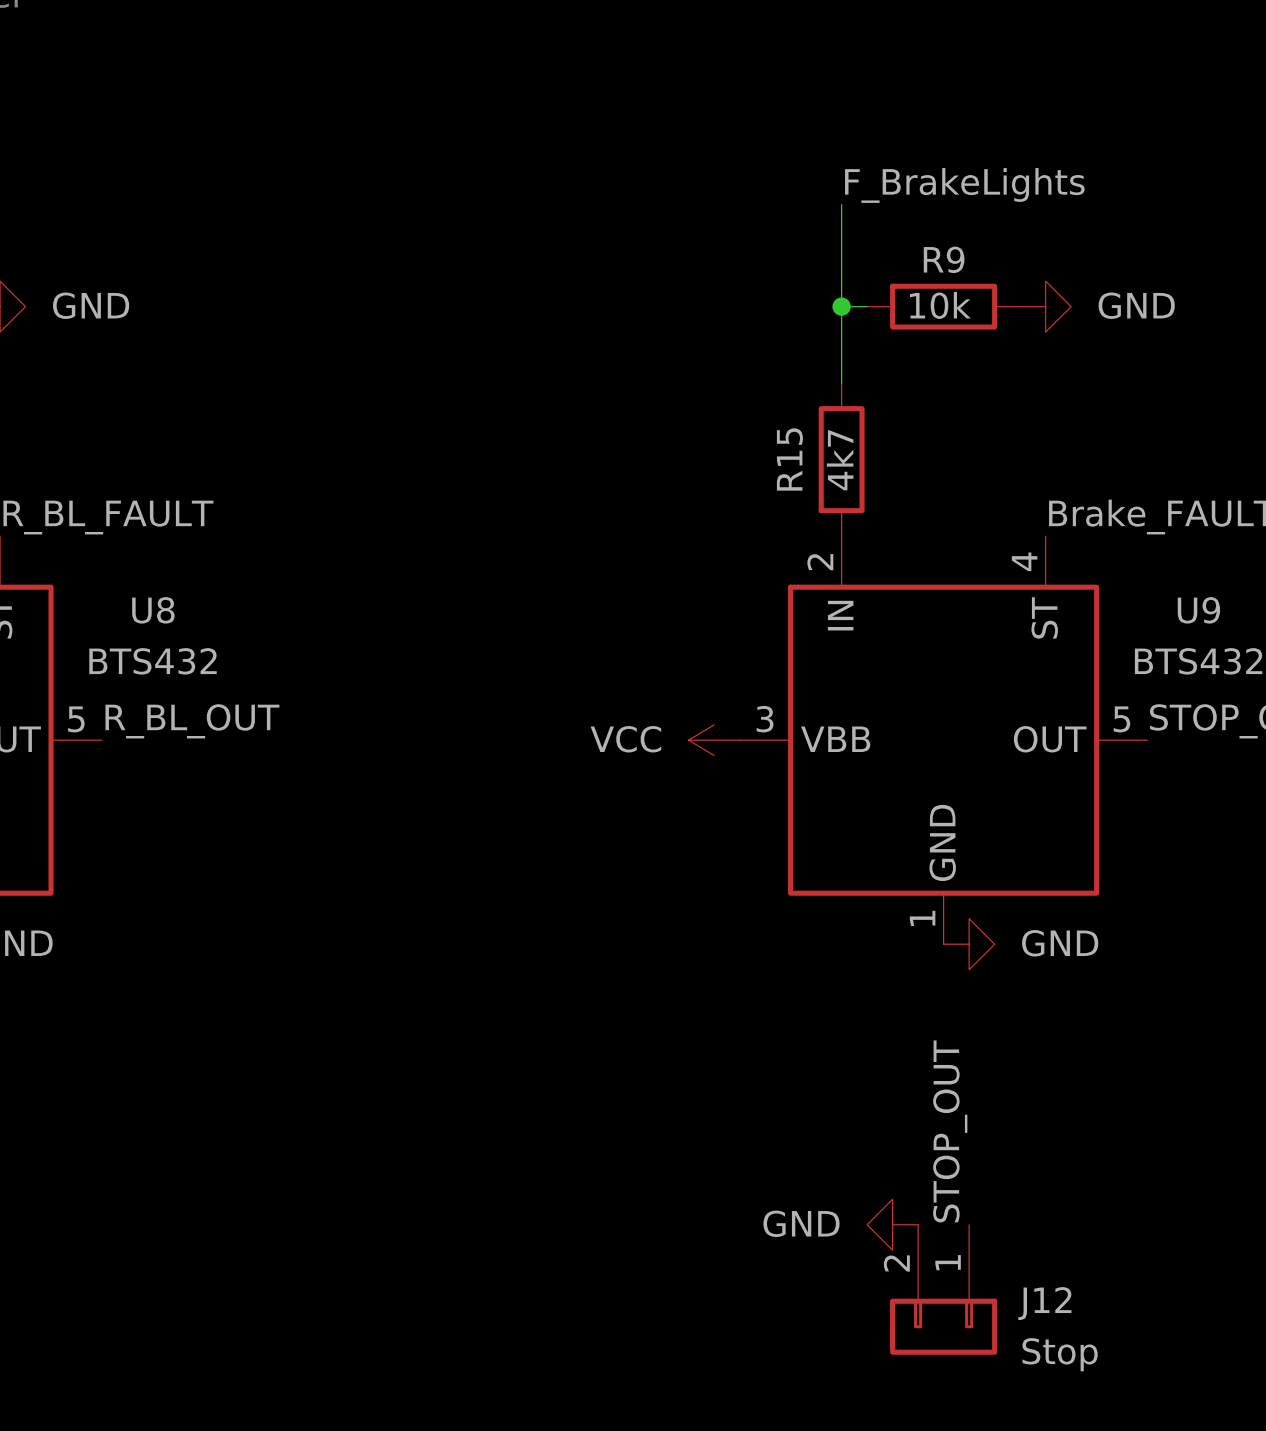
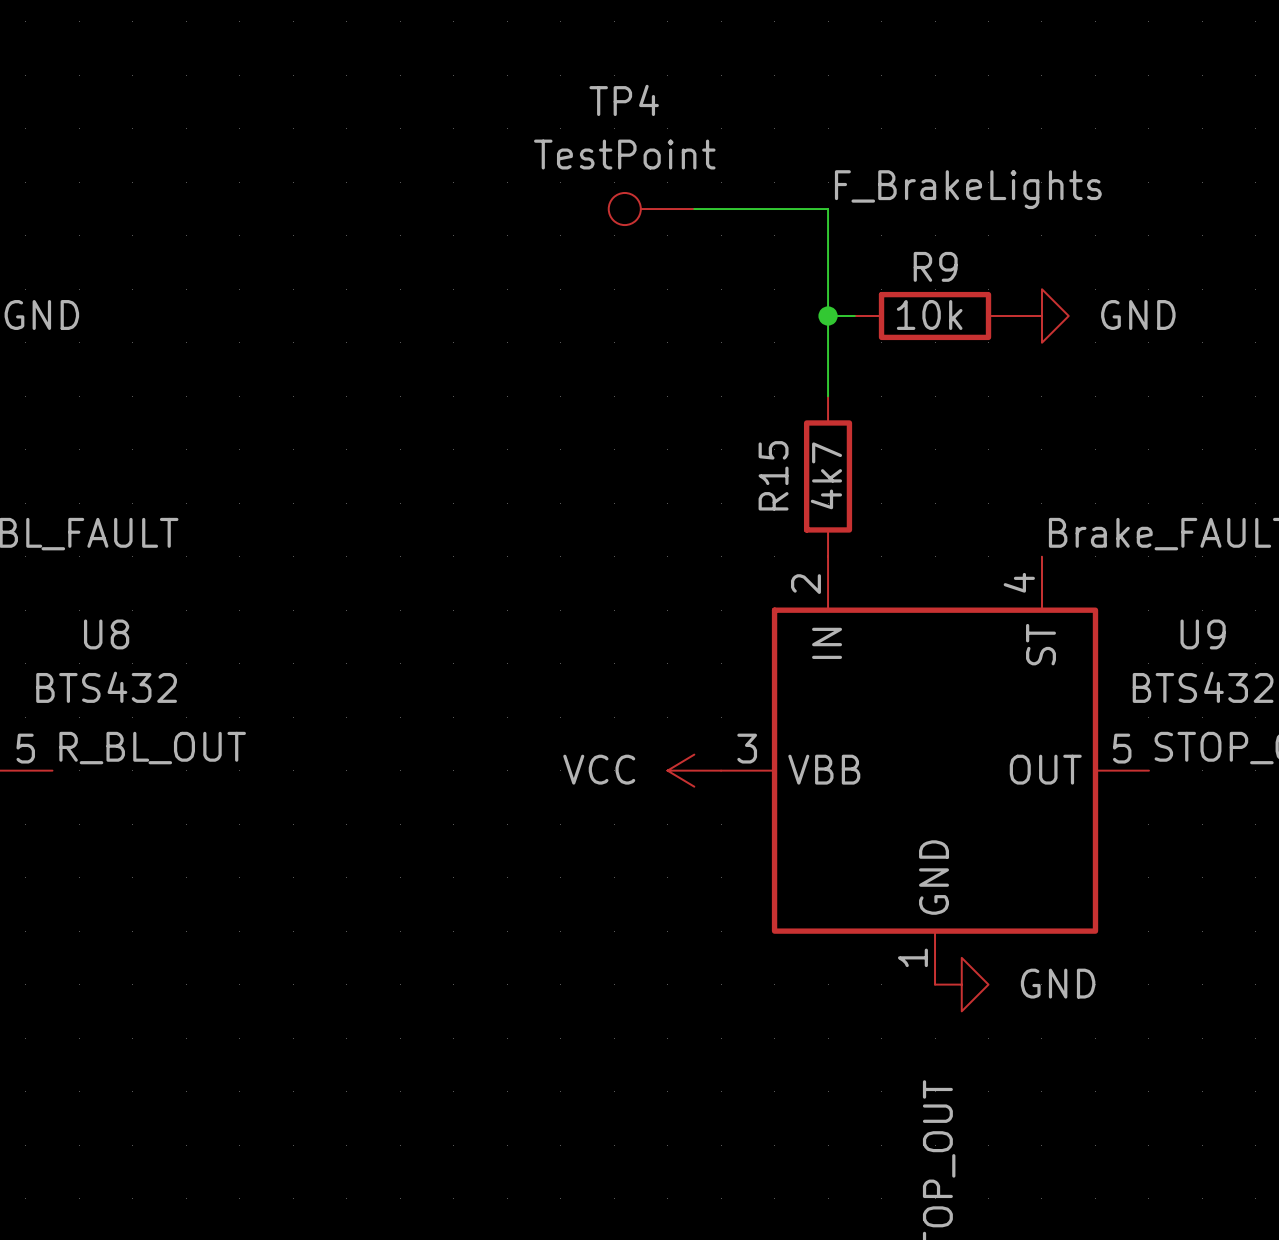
TP4: none -> TestPoint (651, 209)
wire: none -> (694, 209) (828, 209)

